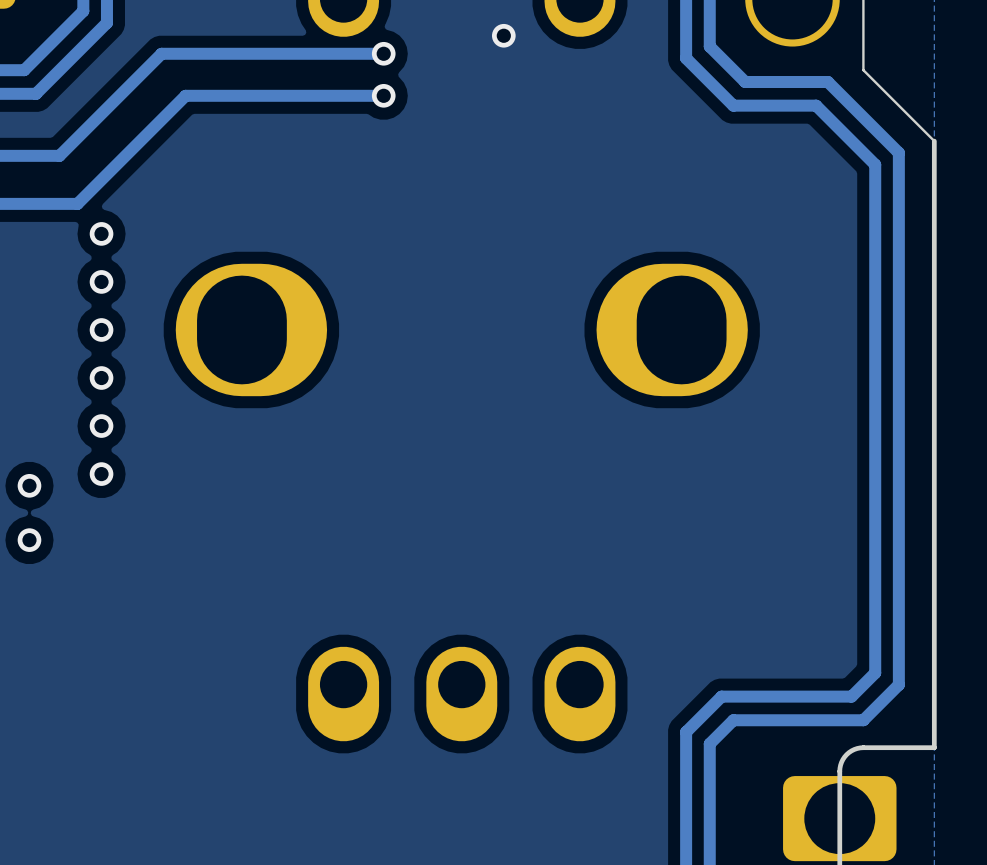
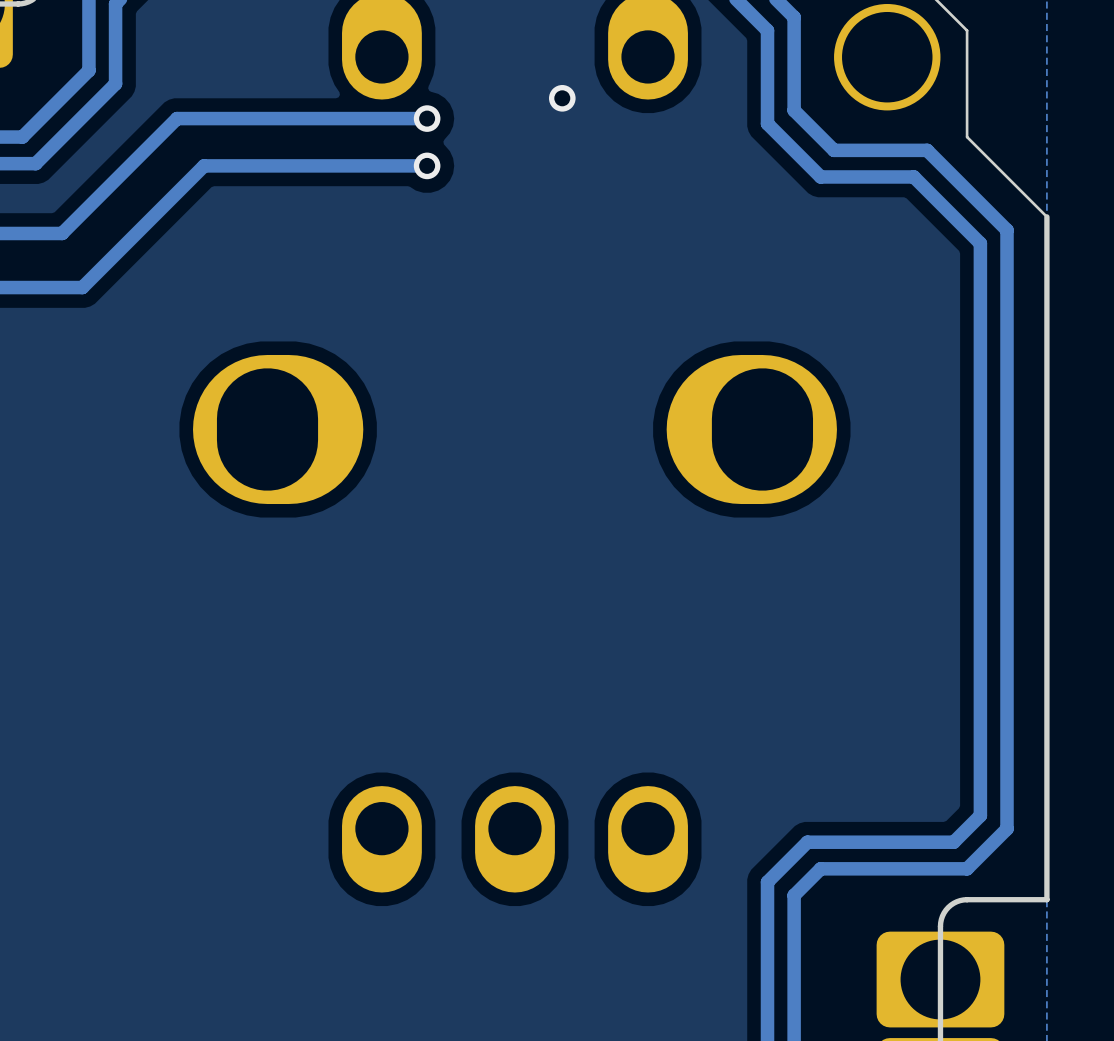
via: (101, 233) -> none
via: (101, 281) -> none
via: (101, 329) -> none
via: (101, 378) -> none
via: (101, 426) -> none
via: (101, 474) -> none
via: (29, 485) -> none
via: (29, 540) -> none

